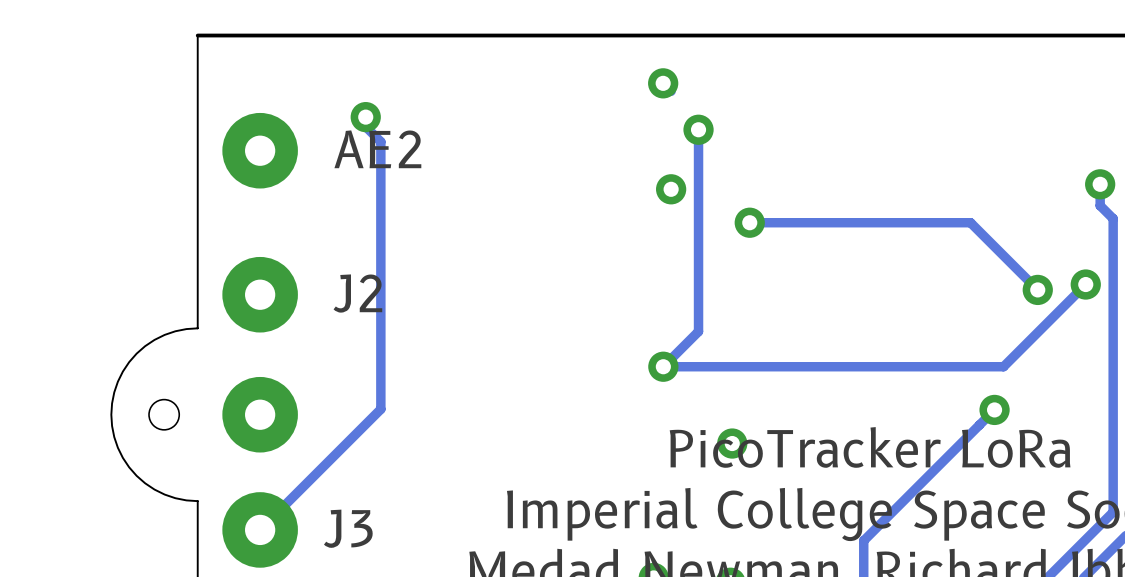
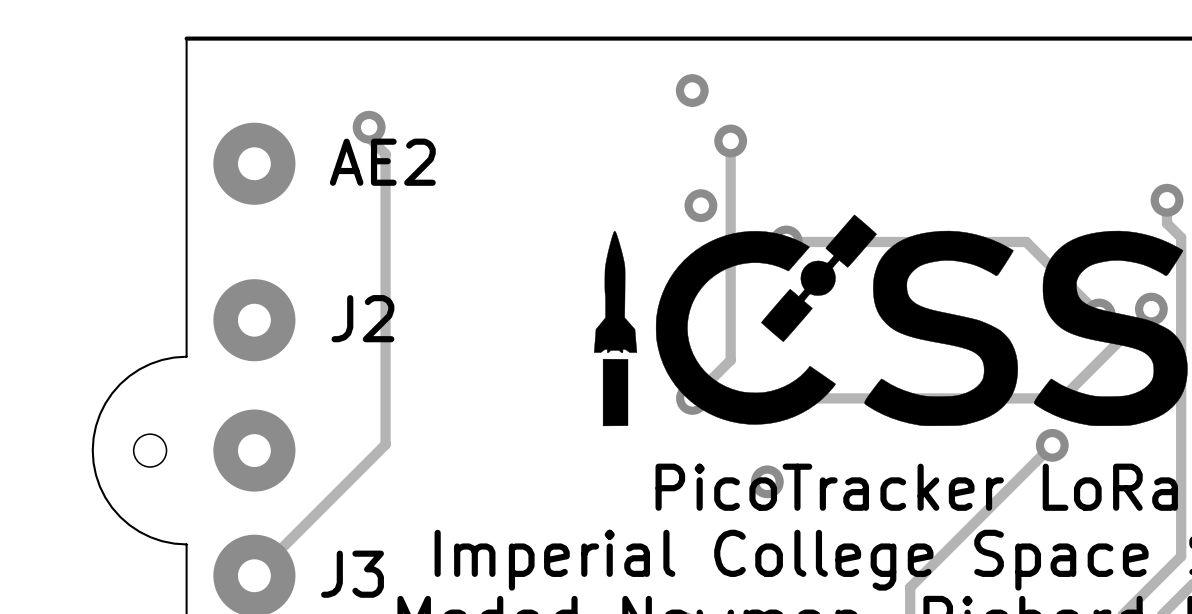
drawing: none -> [594, 214, 1188, 427]

